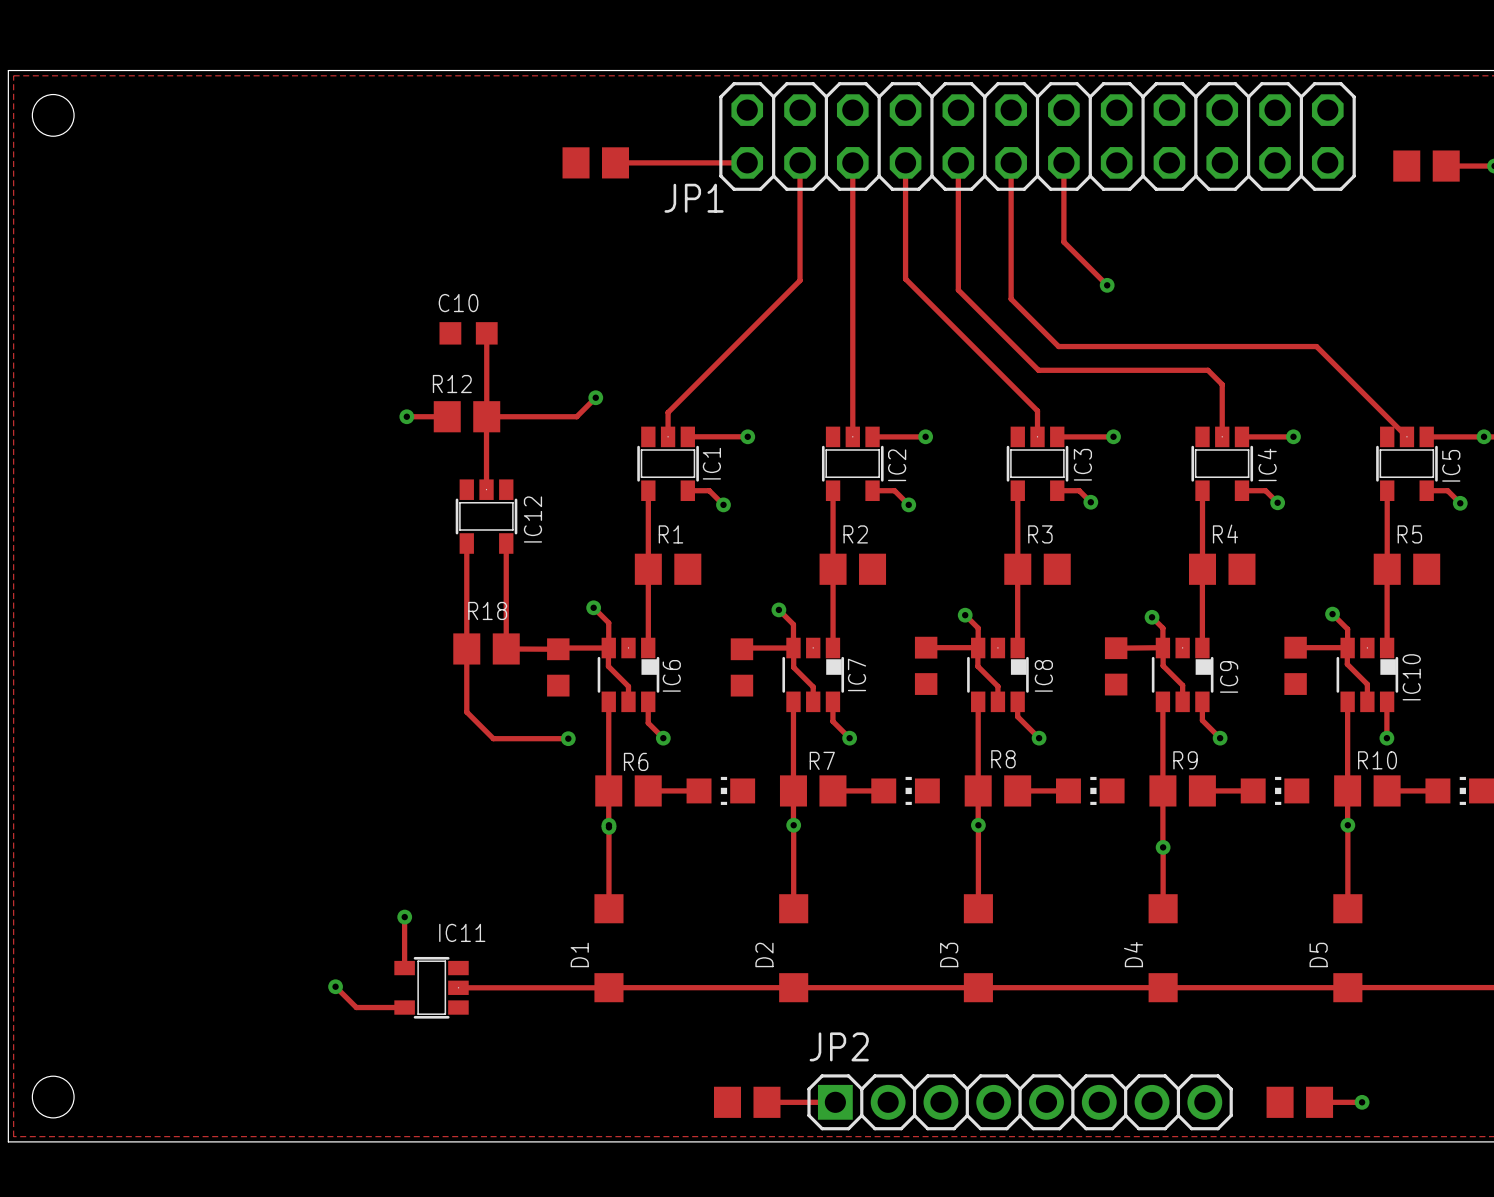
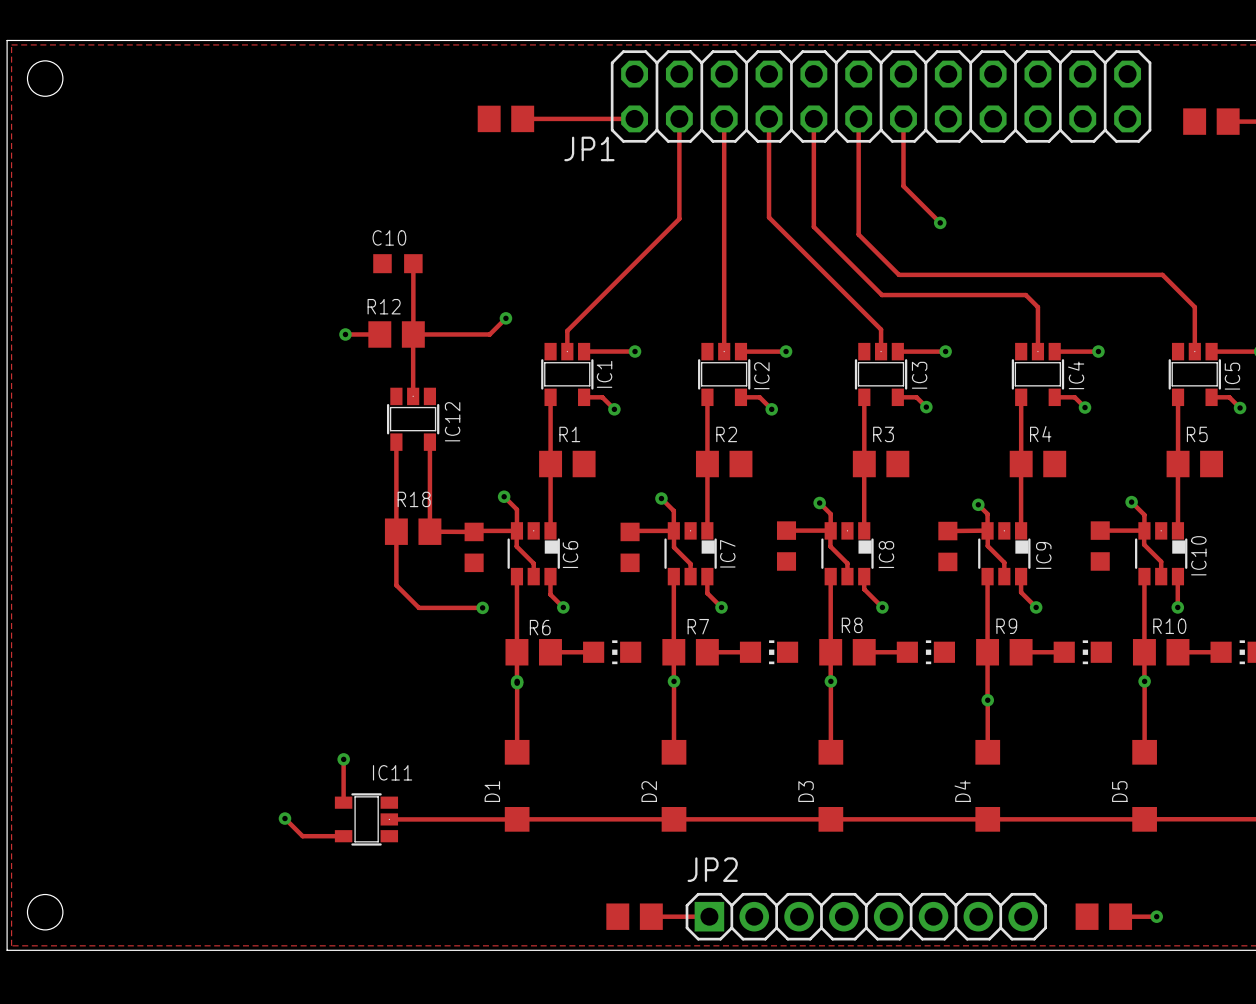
track: (1316, 346) (1406, 436) -> (1118, 274) (1162, 274) (1194, 307) (1194, 351)

